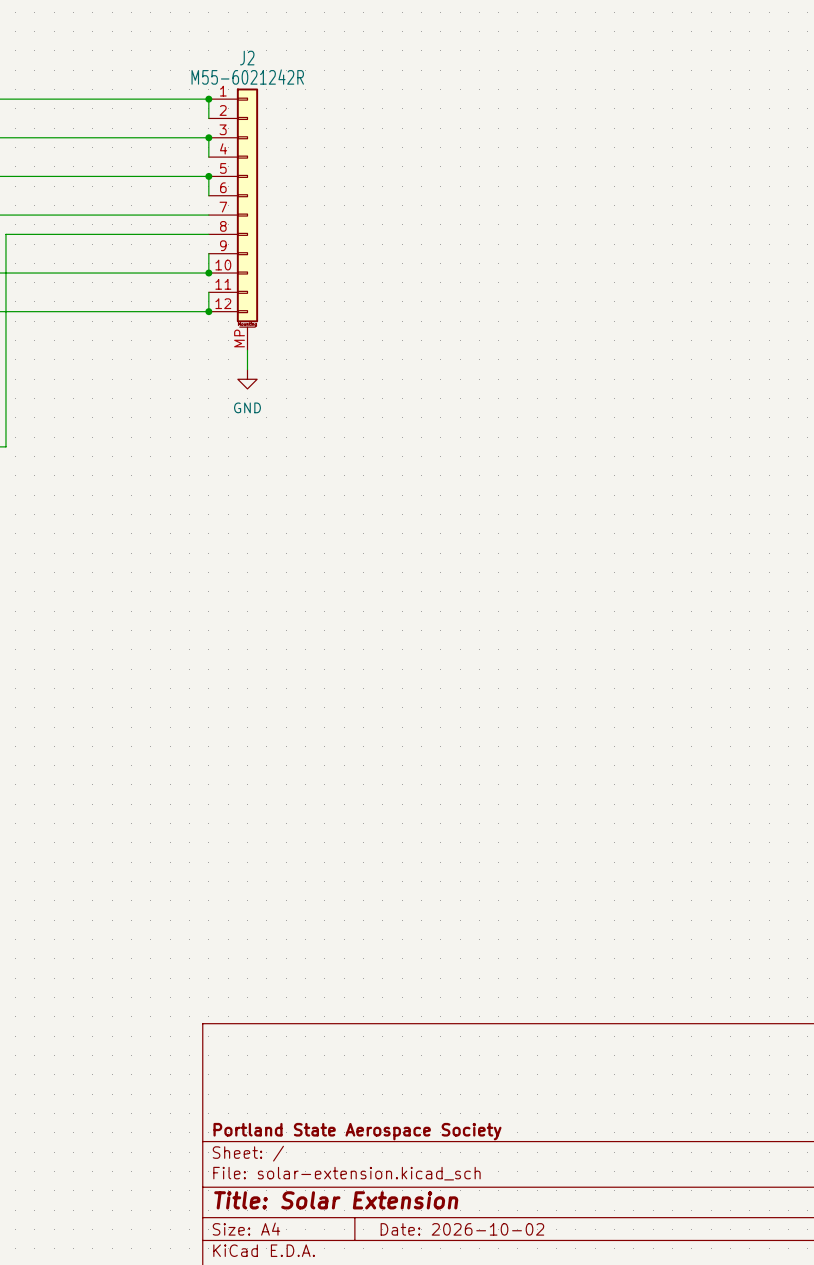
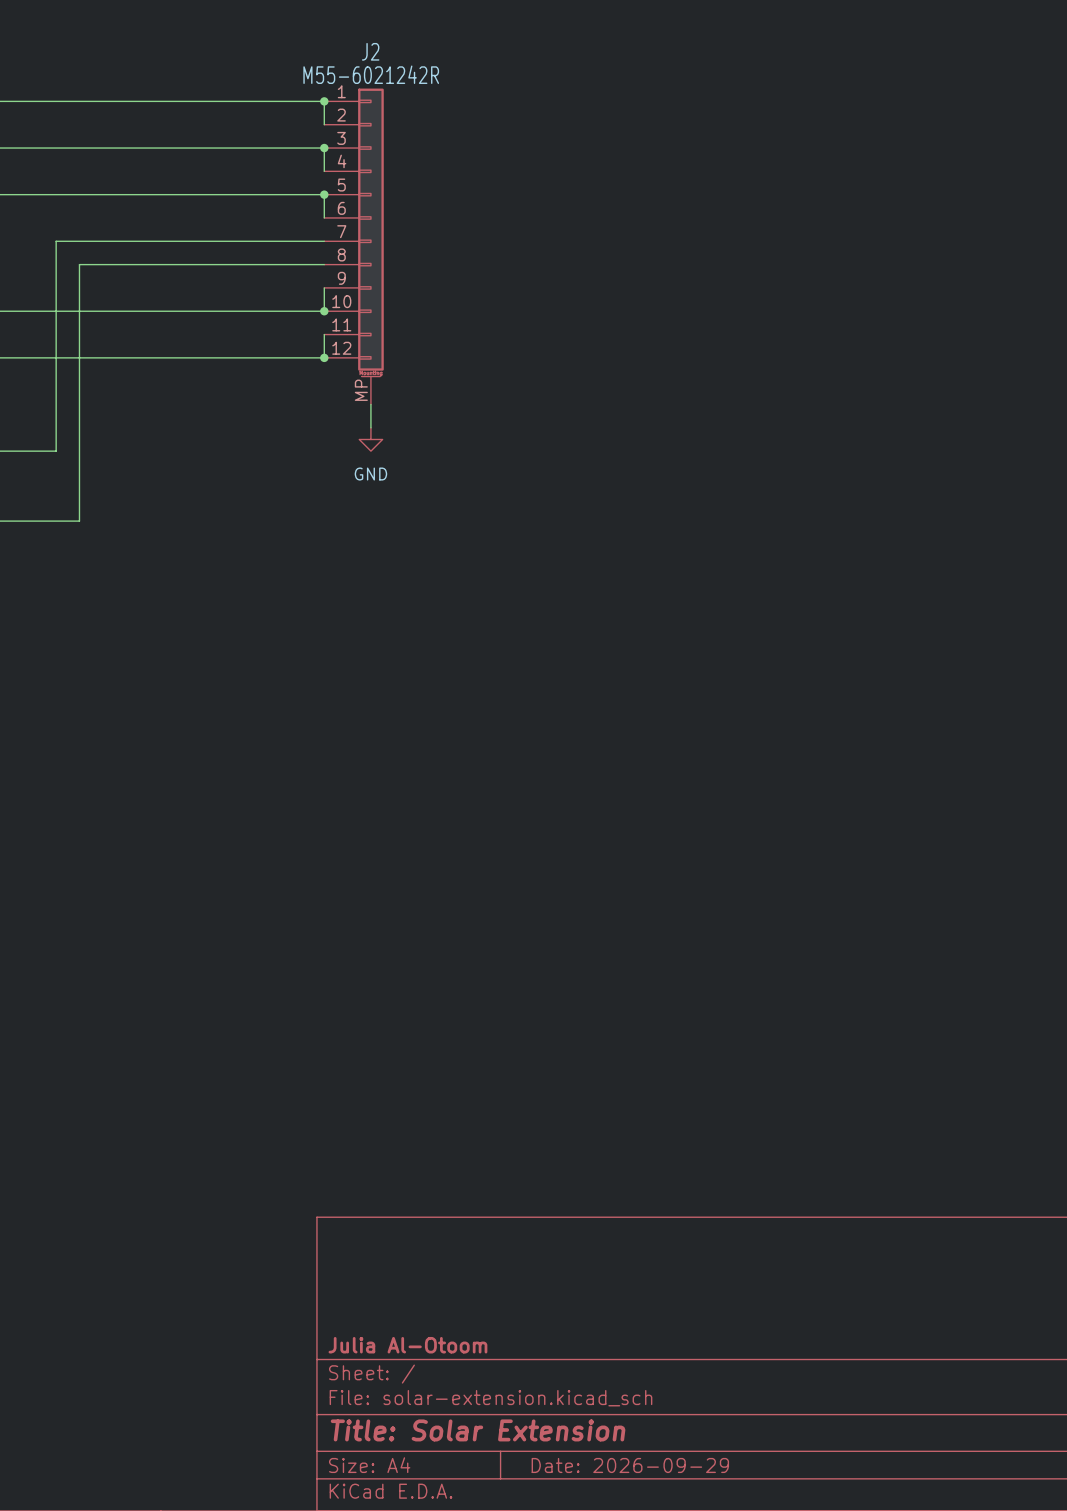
title block: Portland State Aerospace Society (357, 1131) -> Julia Al-Otoom (407, 1345)
title block: Date: 2026-10-02 (462, 1229) -> Date: 2026-09-29 (630, 1465)

